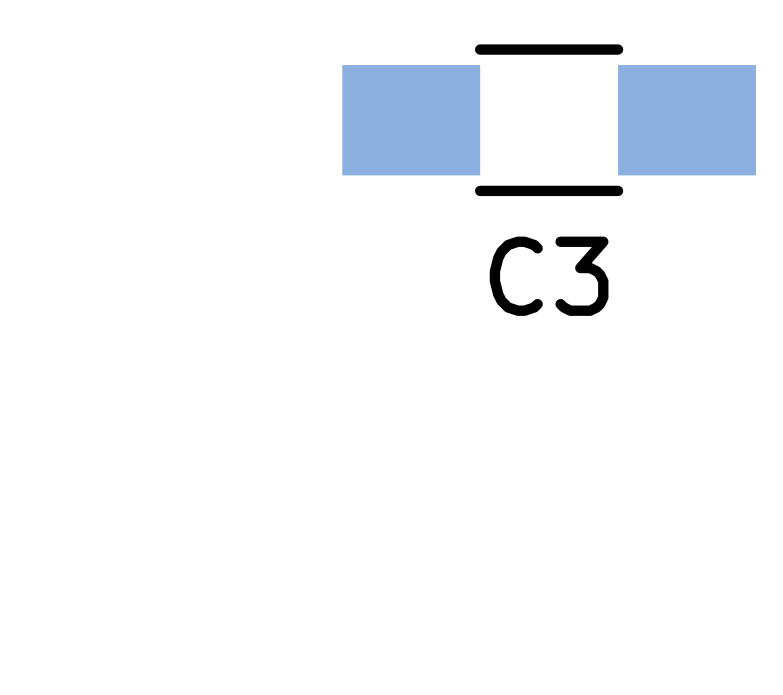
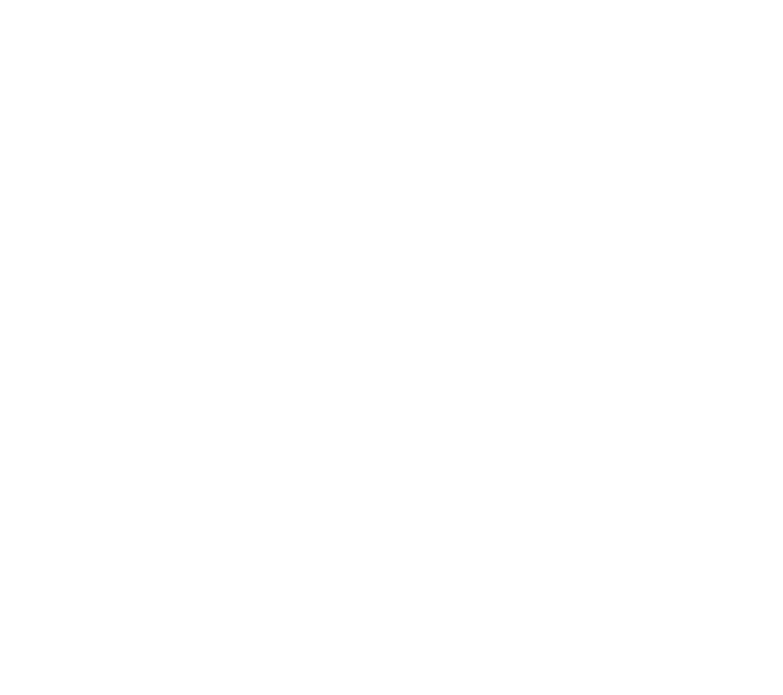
C3: (549, 120) -> none

